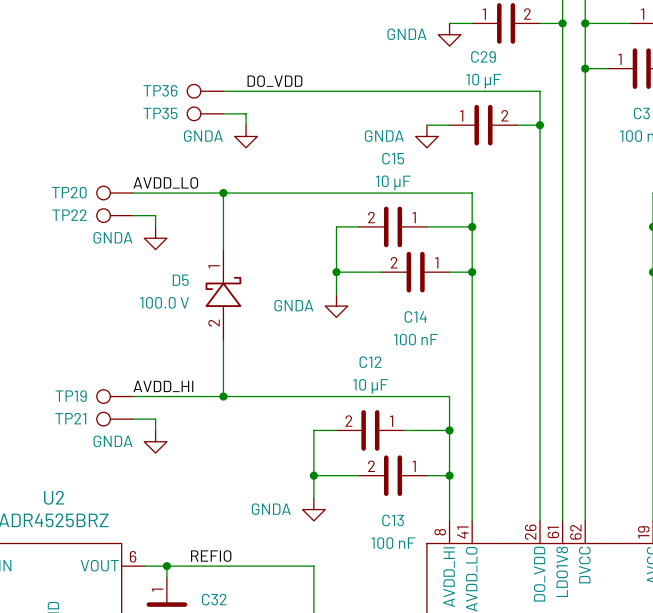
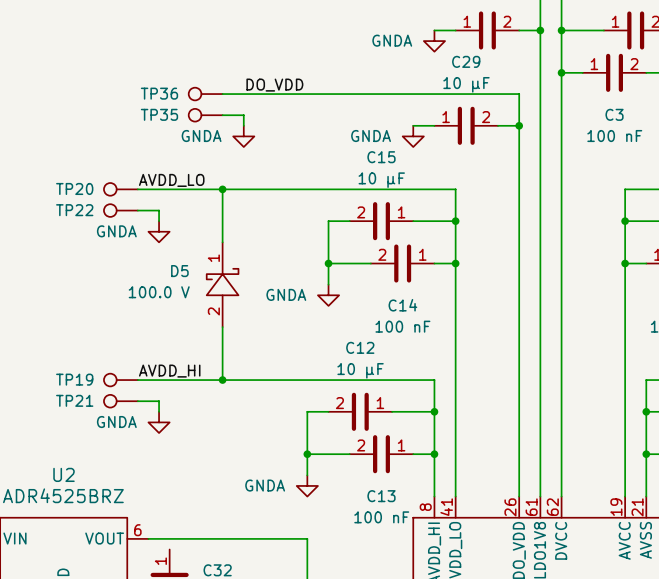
label: REFIO (211, 556) -> none
wire: (166, 566) (166, 577) -> none
junction: (166, 566) -> none

